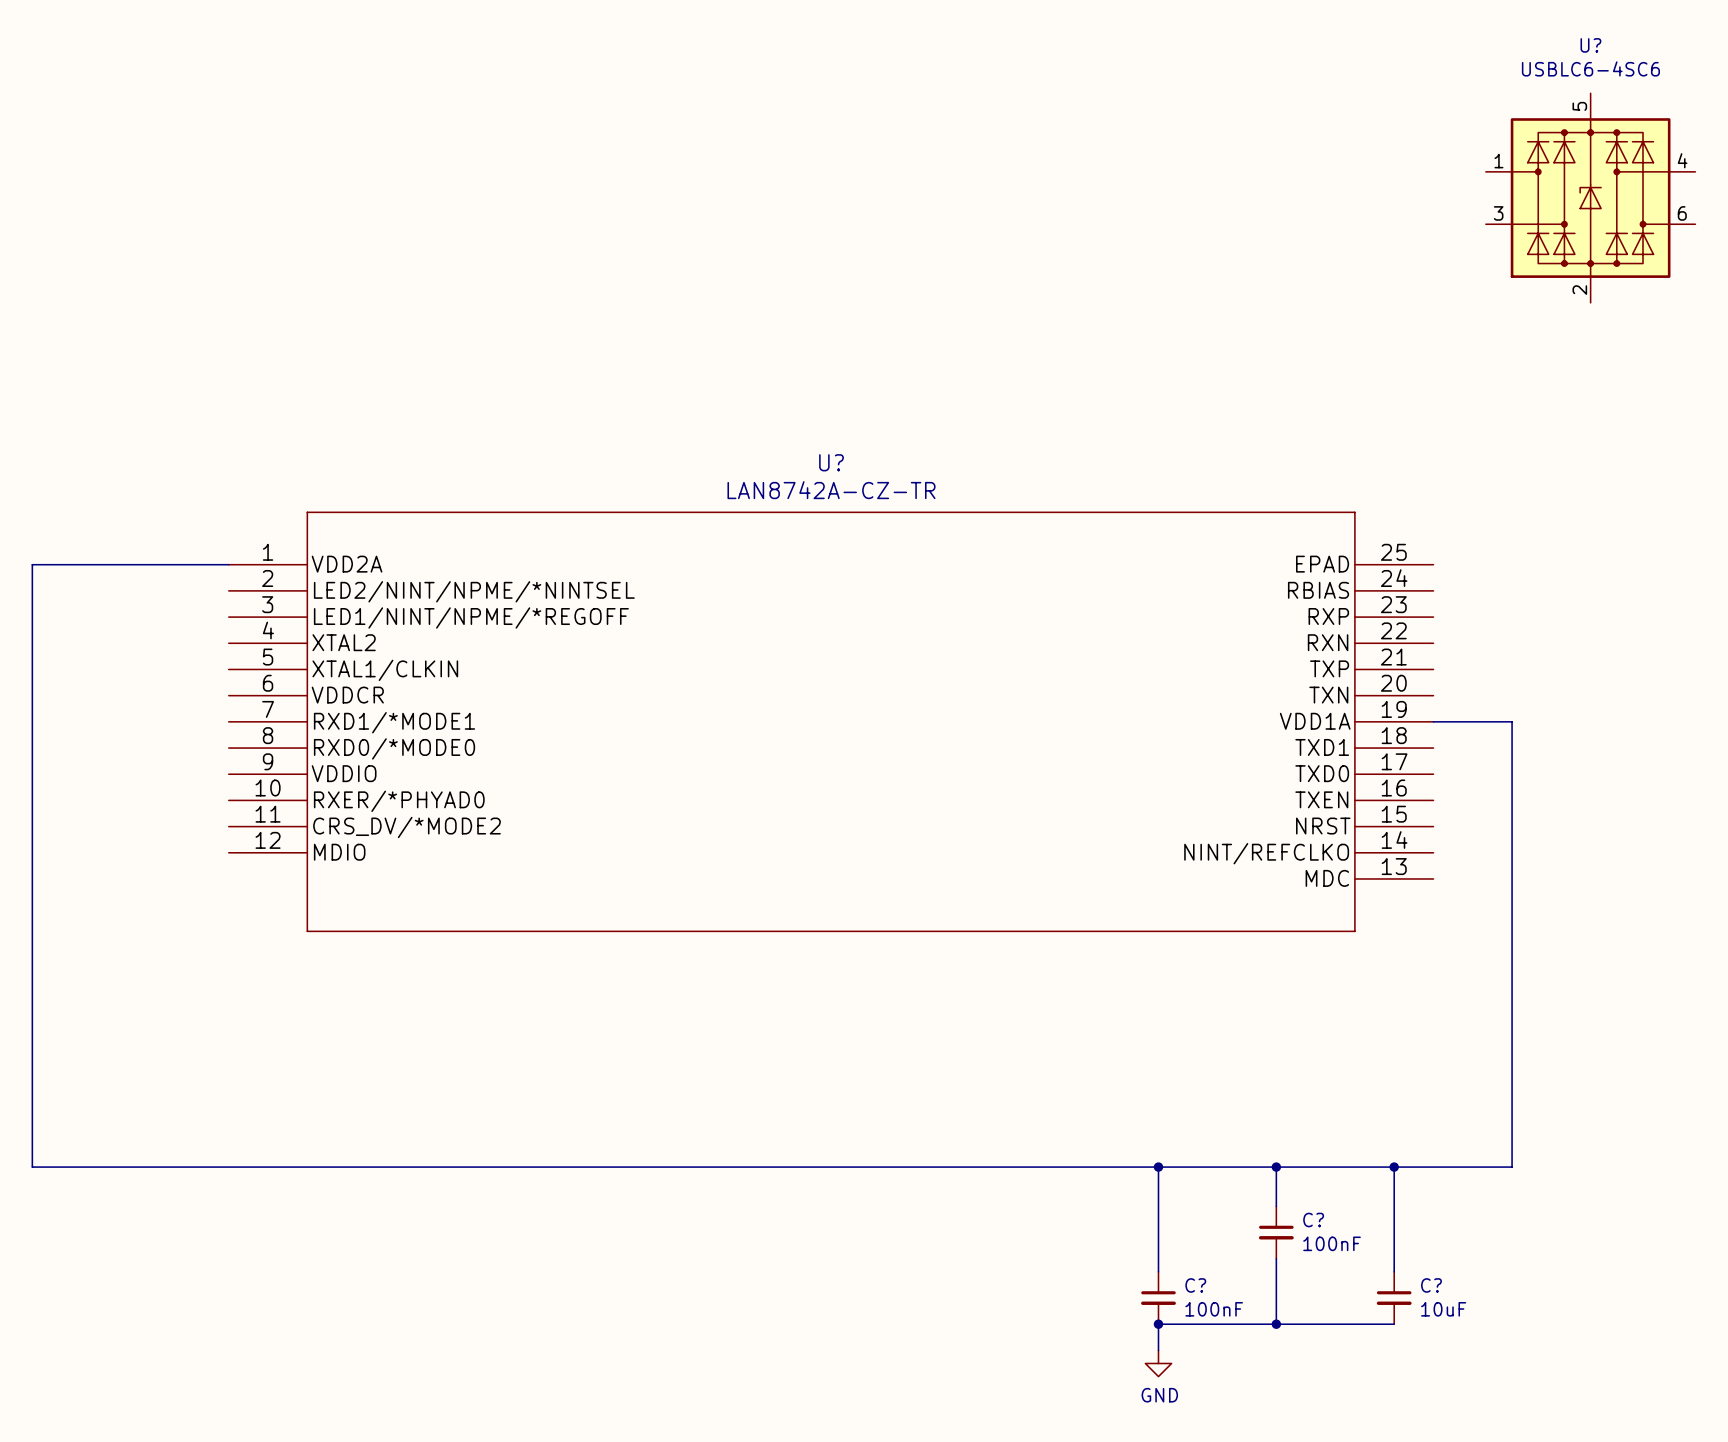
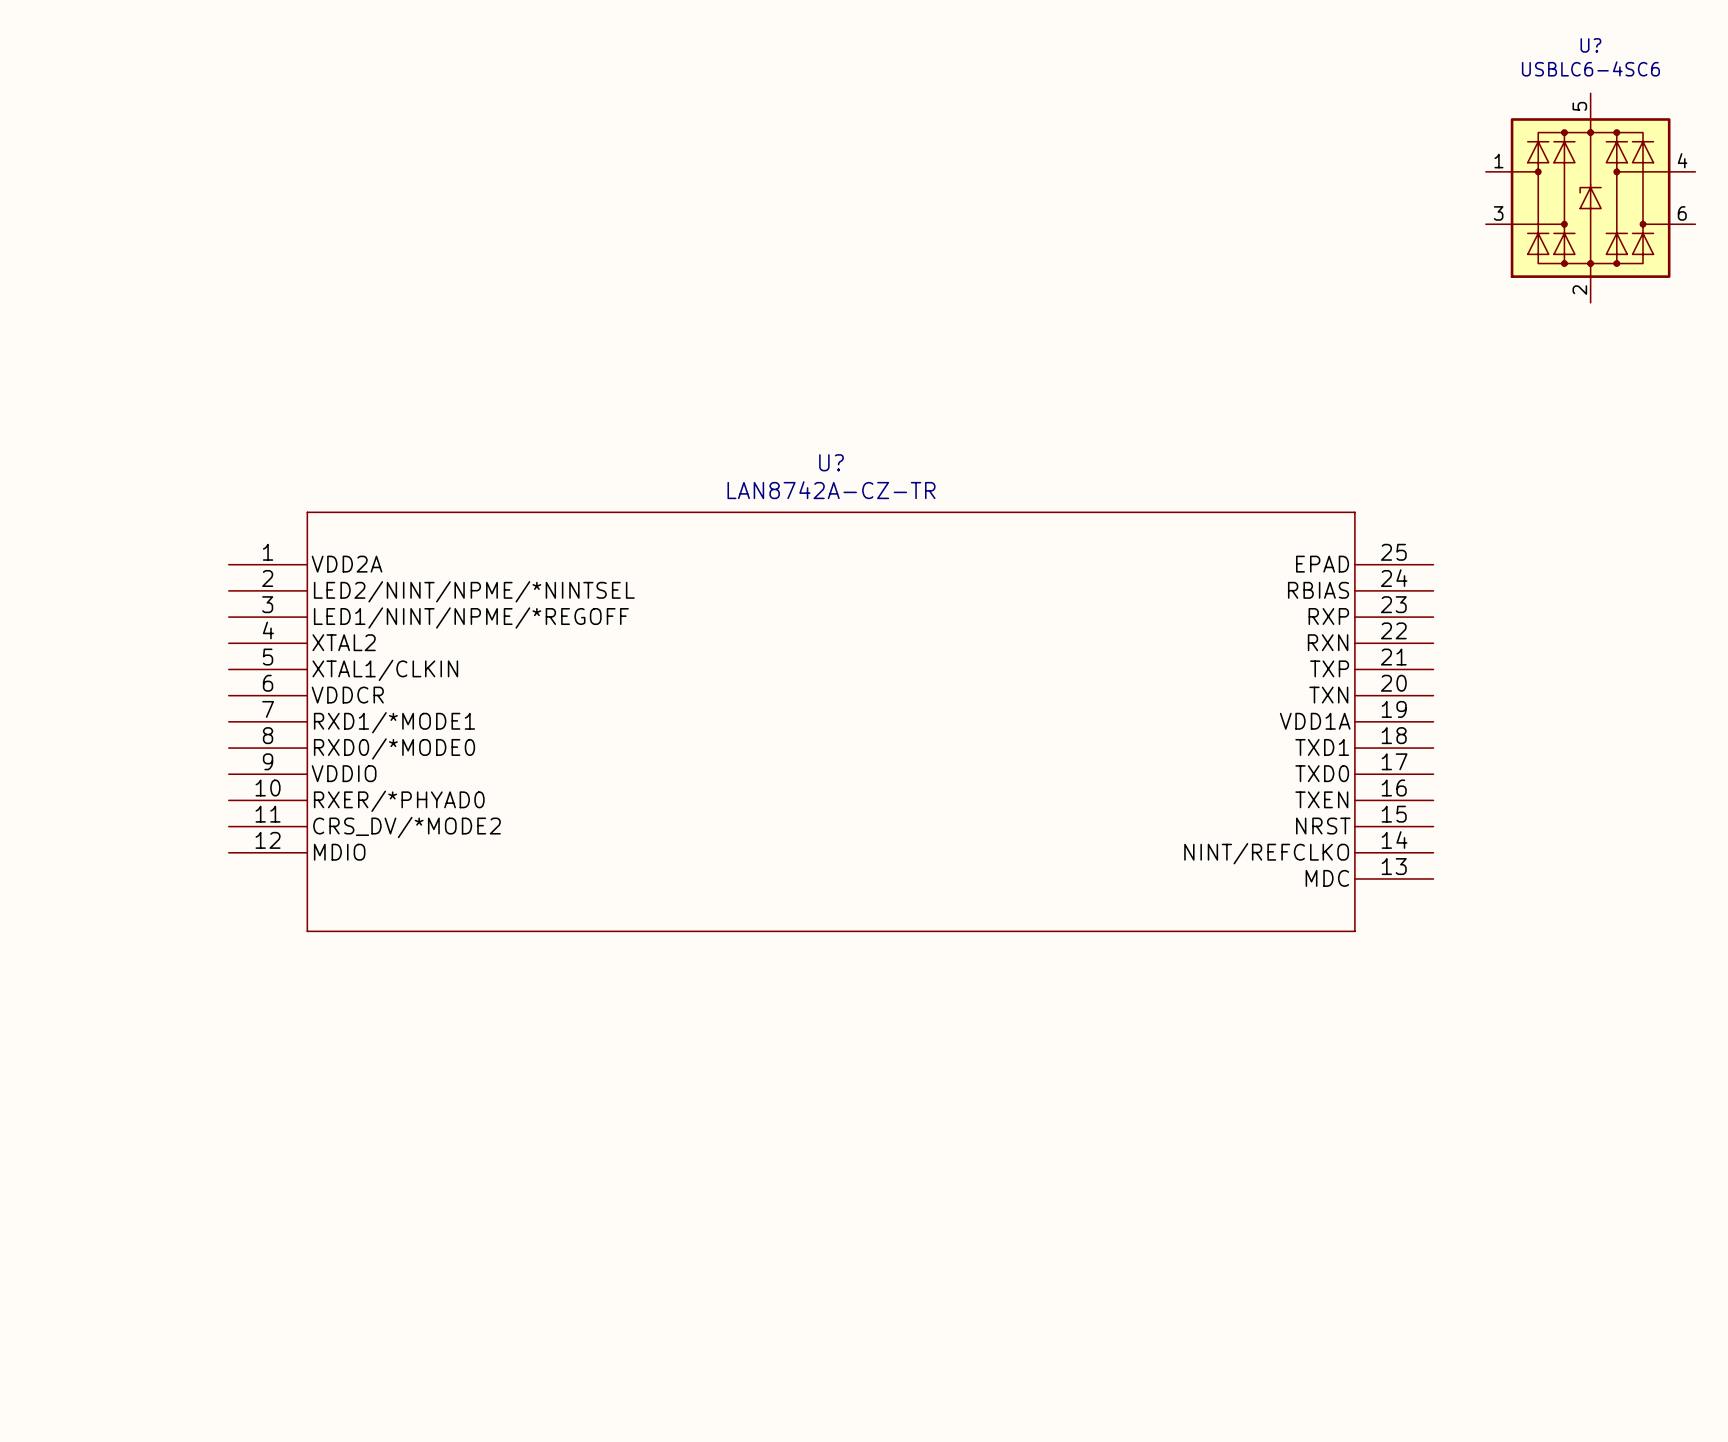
wire: (228, 564) (32, 564) (32, 1167) (1512, 1167) (1512, 721) (1433, 721) -> none
wire: (1158, 1167) (1158, 1271) -> none
junction: (1158, 1167) -> none
wire: (1276, 1167) (1276, 1206) -> none
junction: (1276, 1167) -> none
wire: (1394, 1167) (1394, 1271) -> none
junction: (1394, 1167) -> none
C?: 100nF (1276, 1232) -> none
wire: (1276, 1258) (1276, 1324) -> none
C?: 100nF (1158, 1298) -> none
C?: 10uF (1394, 1298) -> none
junction: (1158, 1324) -> none
junction: (1276, 1324) -> none
wire: (1394, 1324) (1158, 1324) (1158, 1350) -> none
power symbol: GND (1158, 1363) -> none

